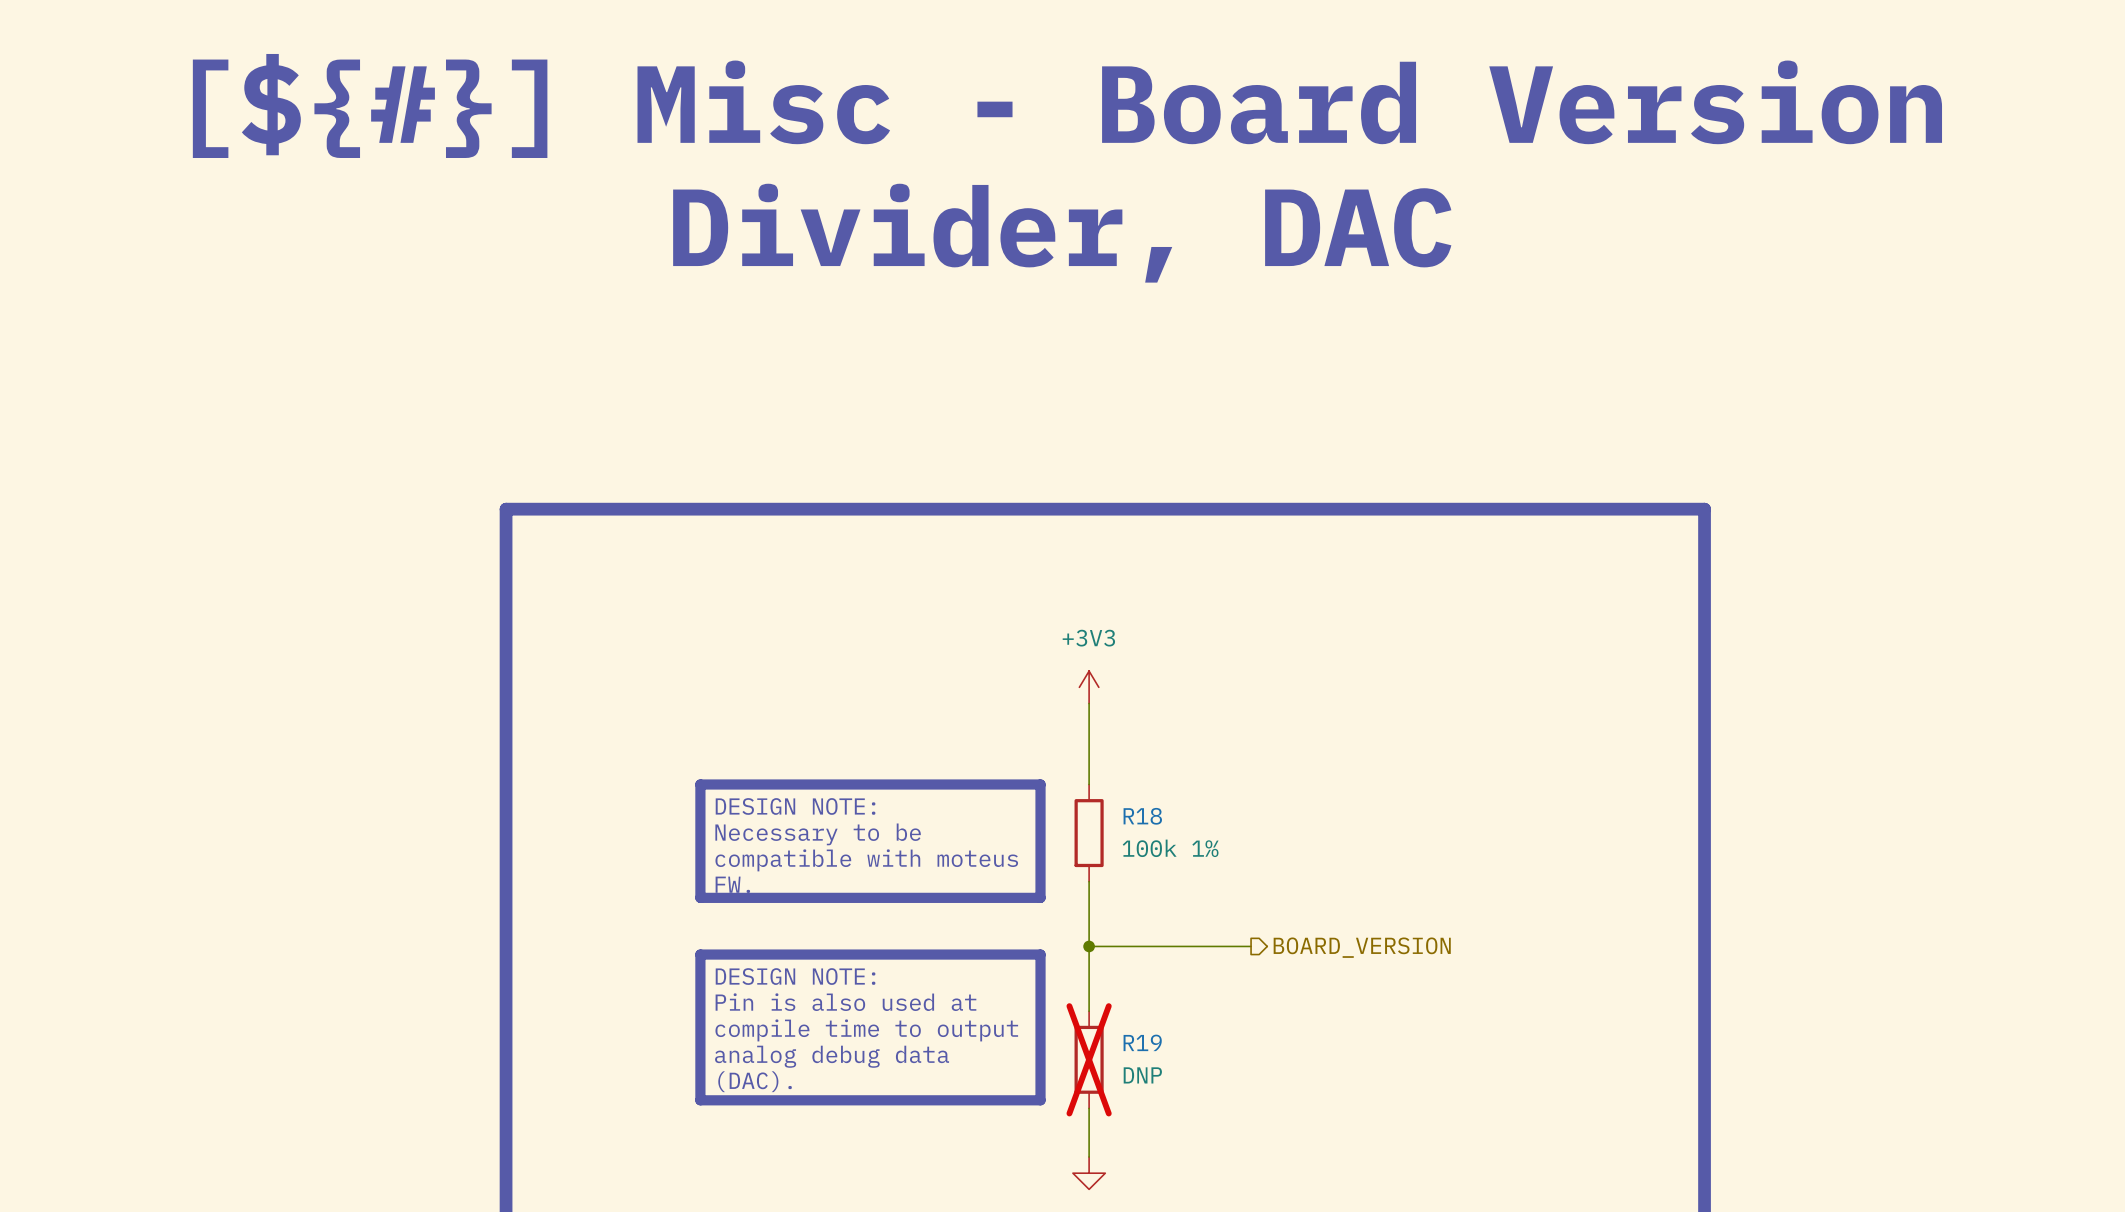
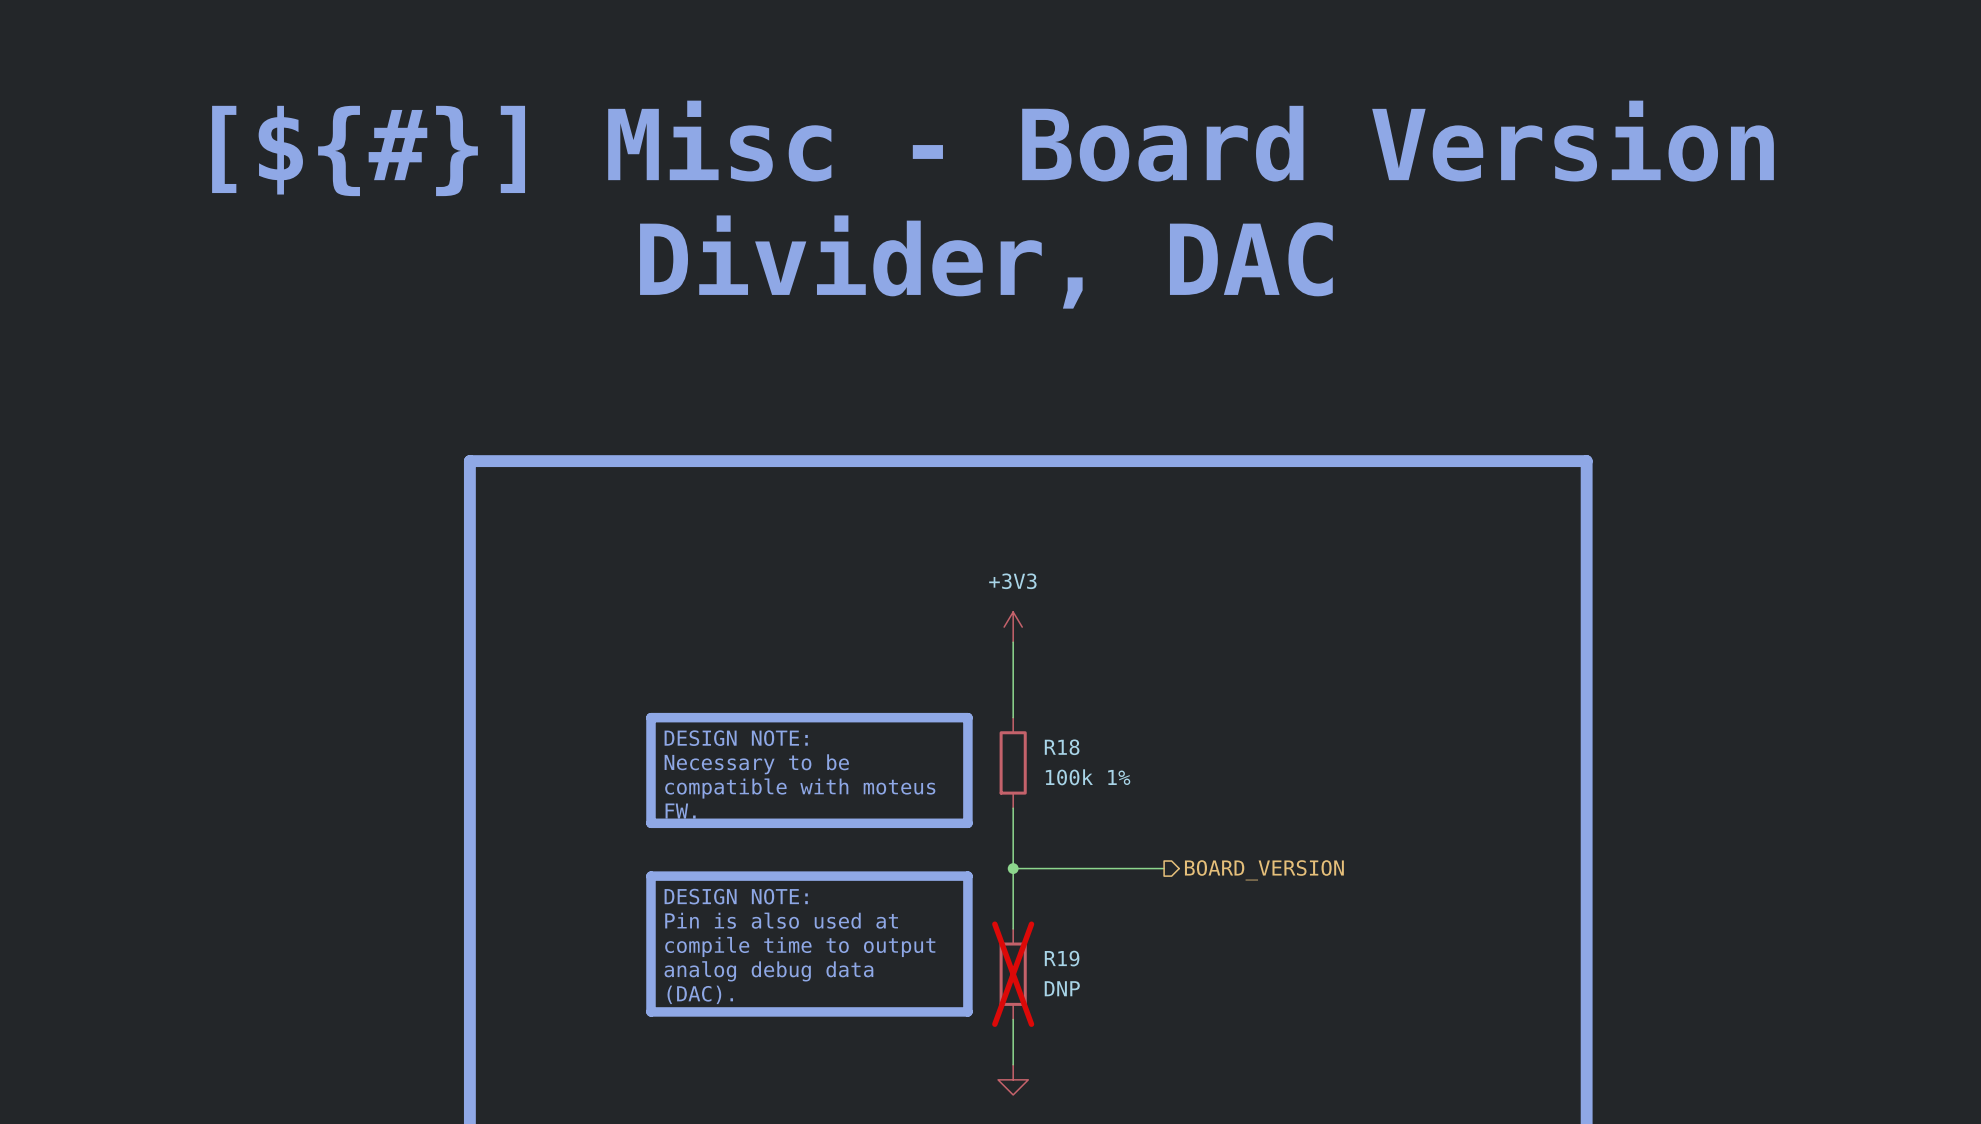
text position: [${#}] Misc - Board Version (1067, 105) -> [${#}] Misc - Board Version (992, 148)
text position: Divider, DAC (1062, 233) -> Divider, DAC (986, 262)

